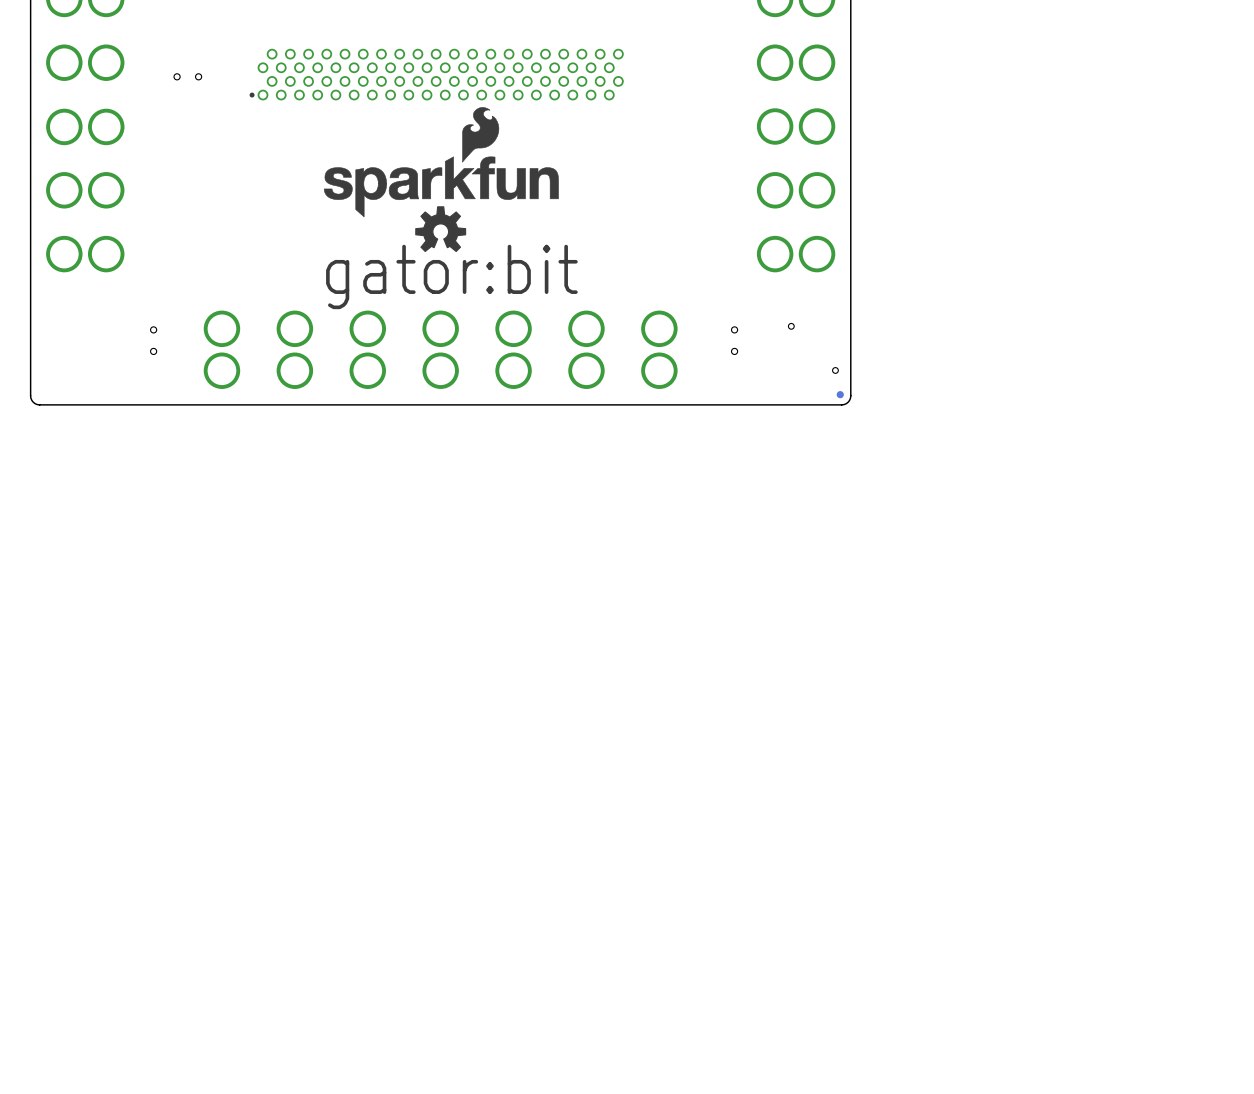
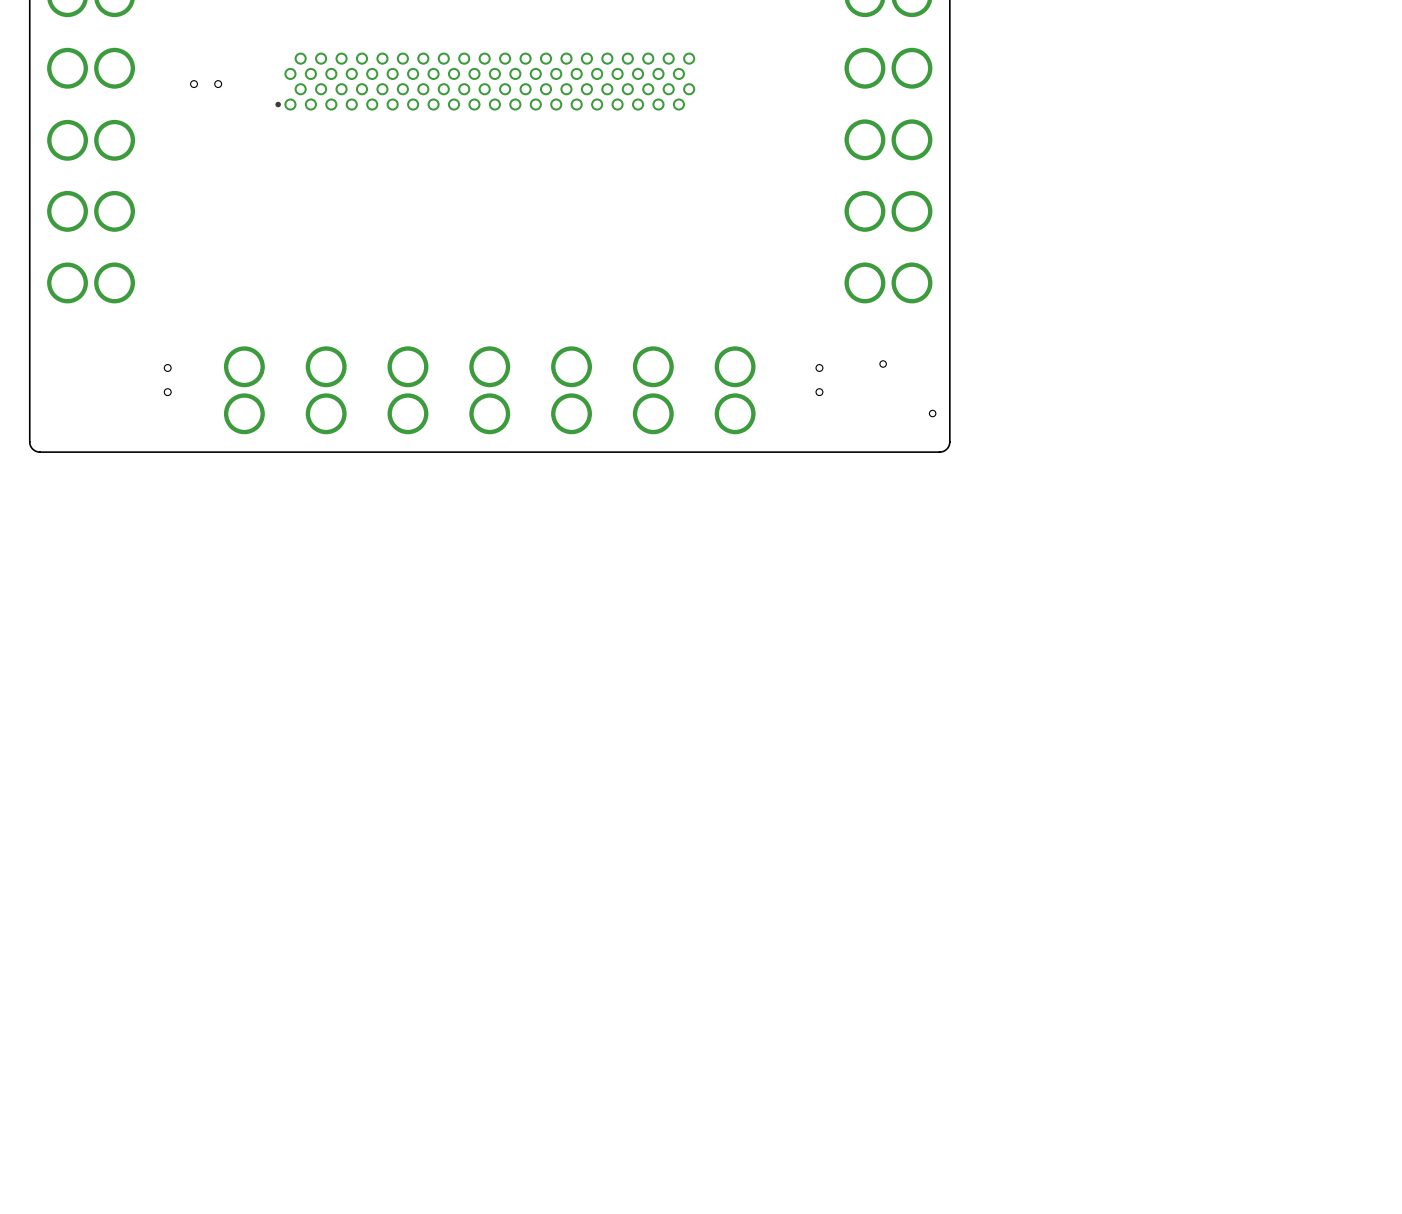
drawing: [323, 107, 559, 253] -> none
text: gator:bit (451, 276) -> none
part: (840, 394) -> none

